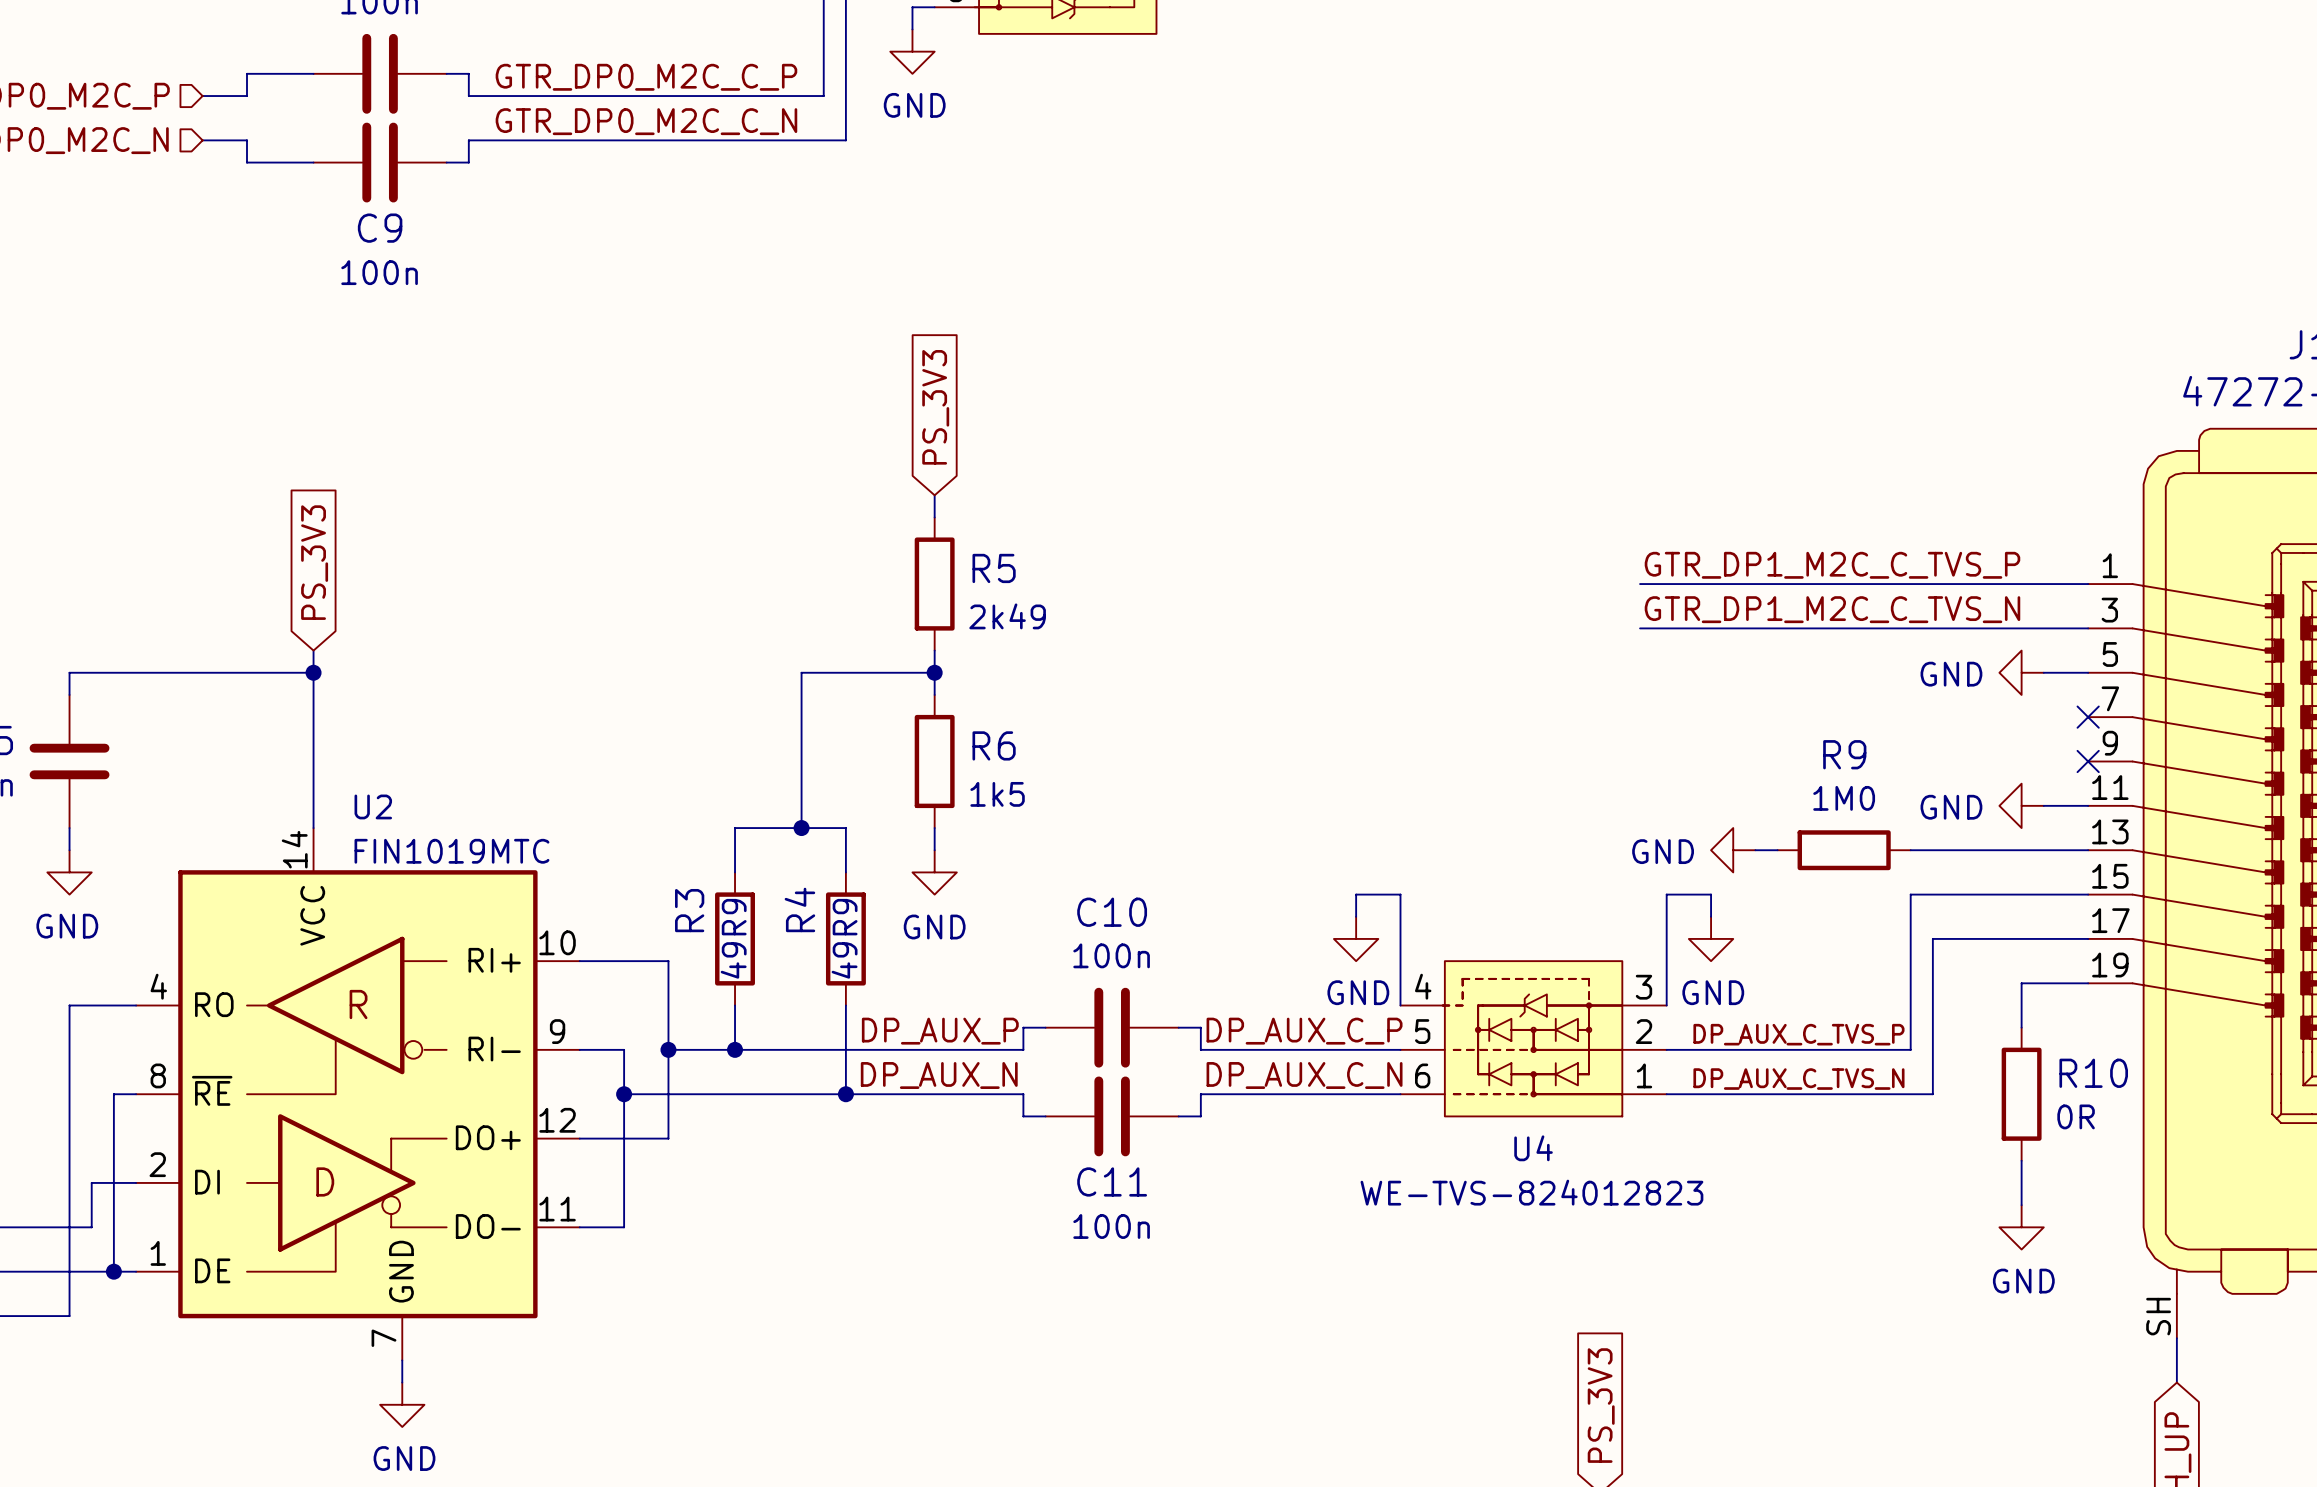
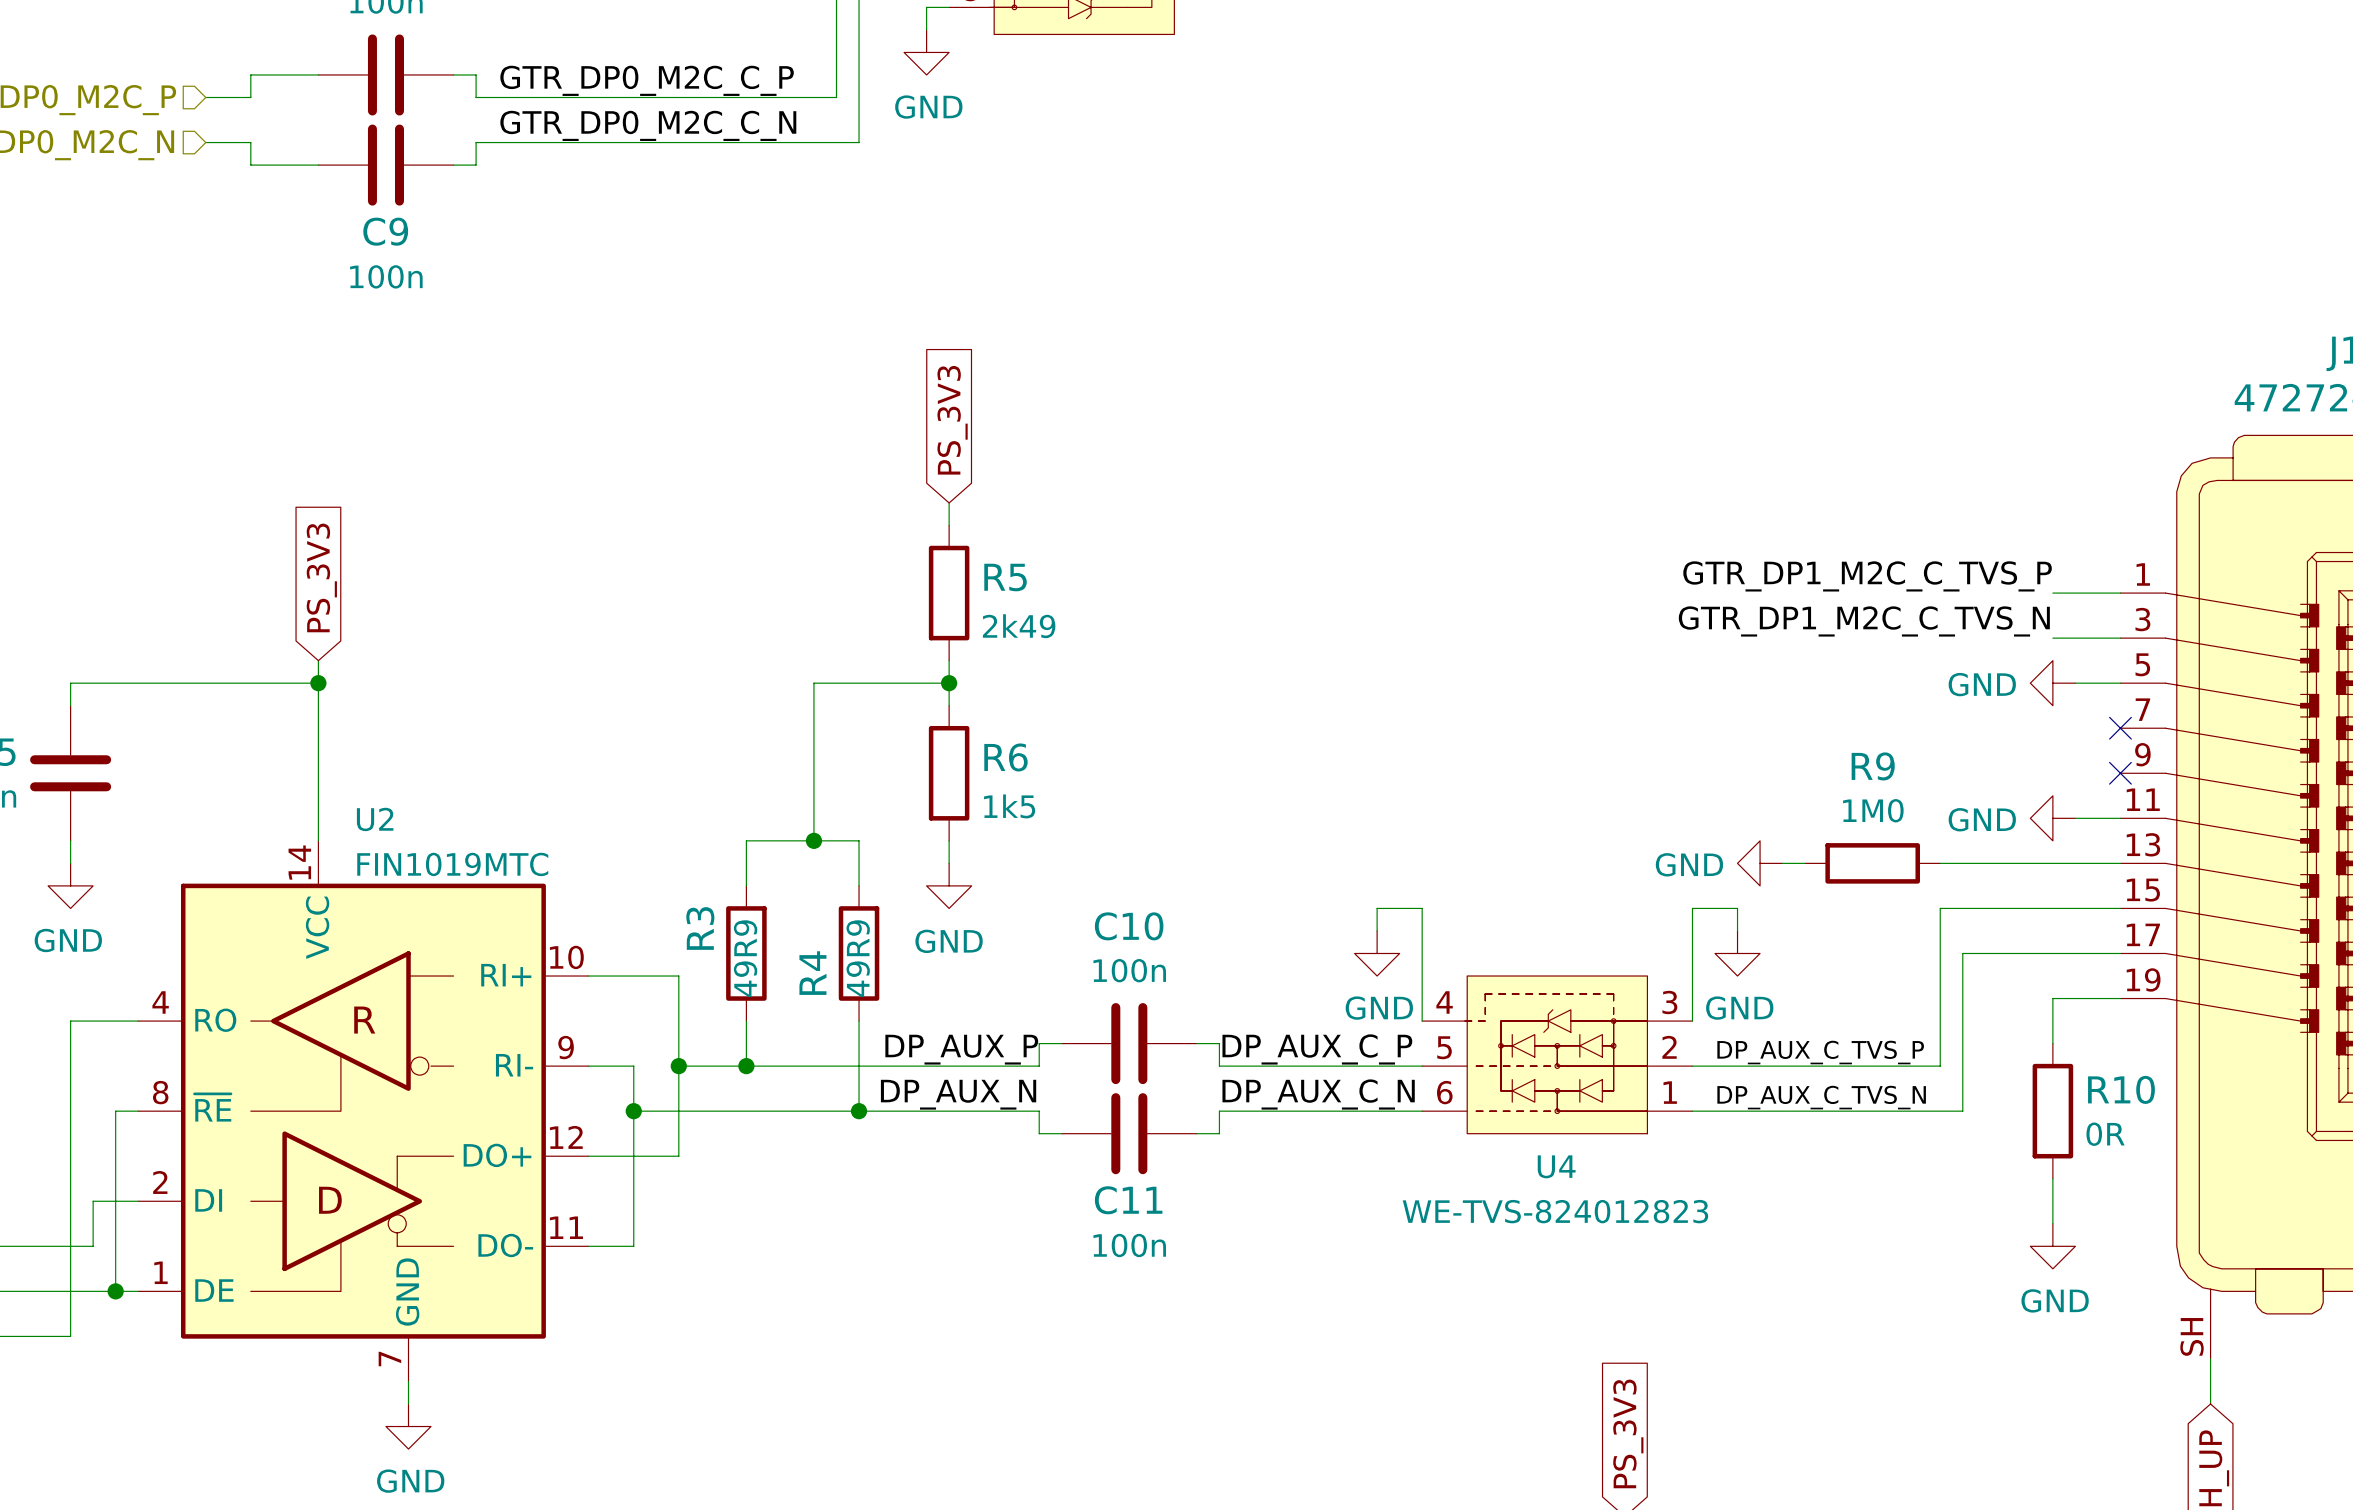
label position: GTR_DP1_M2C_C_TVS_P (1832, 565) -> GTR_DP1_M2C_C_TVS_P (1867, 576)
wire: (1640, 584) (2021, 584) -> none
label position: GTR_DP1_M2C_C_TVS_N (1832, 609) -> GTR_DP1_M2C_C_TVS_N (1864, 621)
wire: (1640, 628) (2021, 628) -> none
R4 name position: R4 (799, 909) -> R4 (812, 973)

